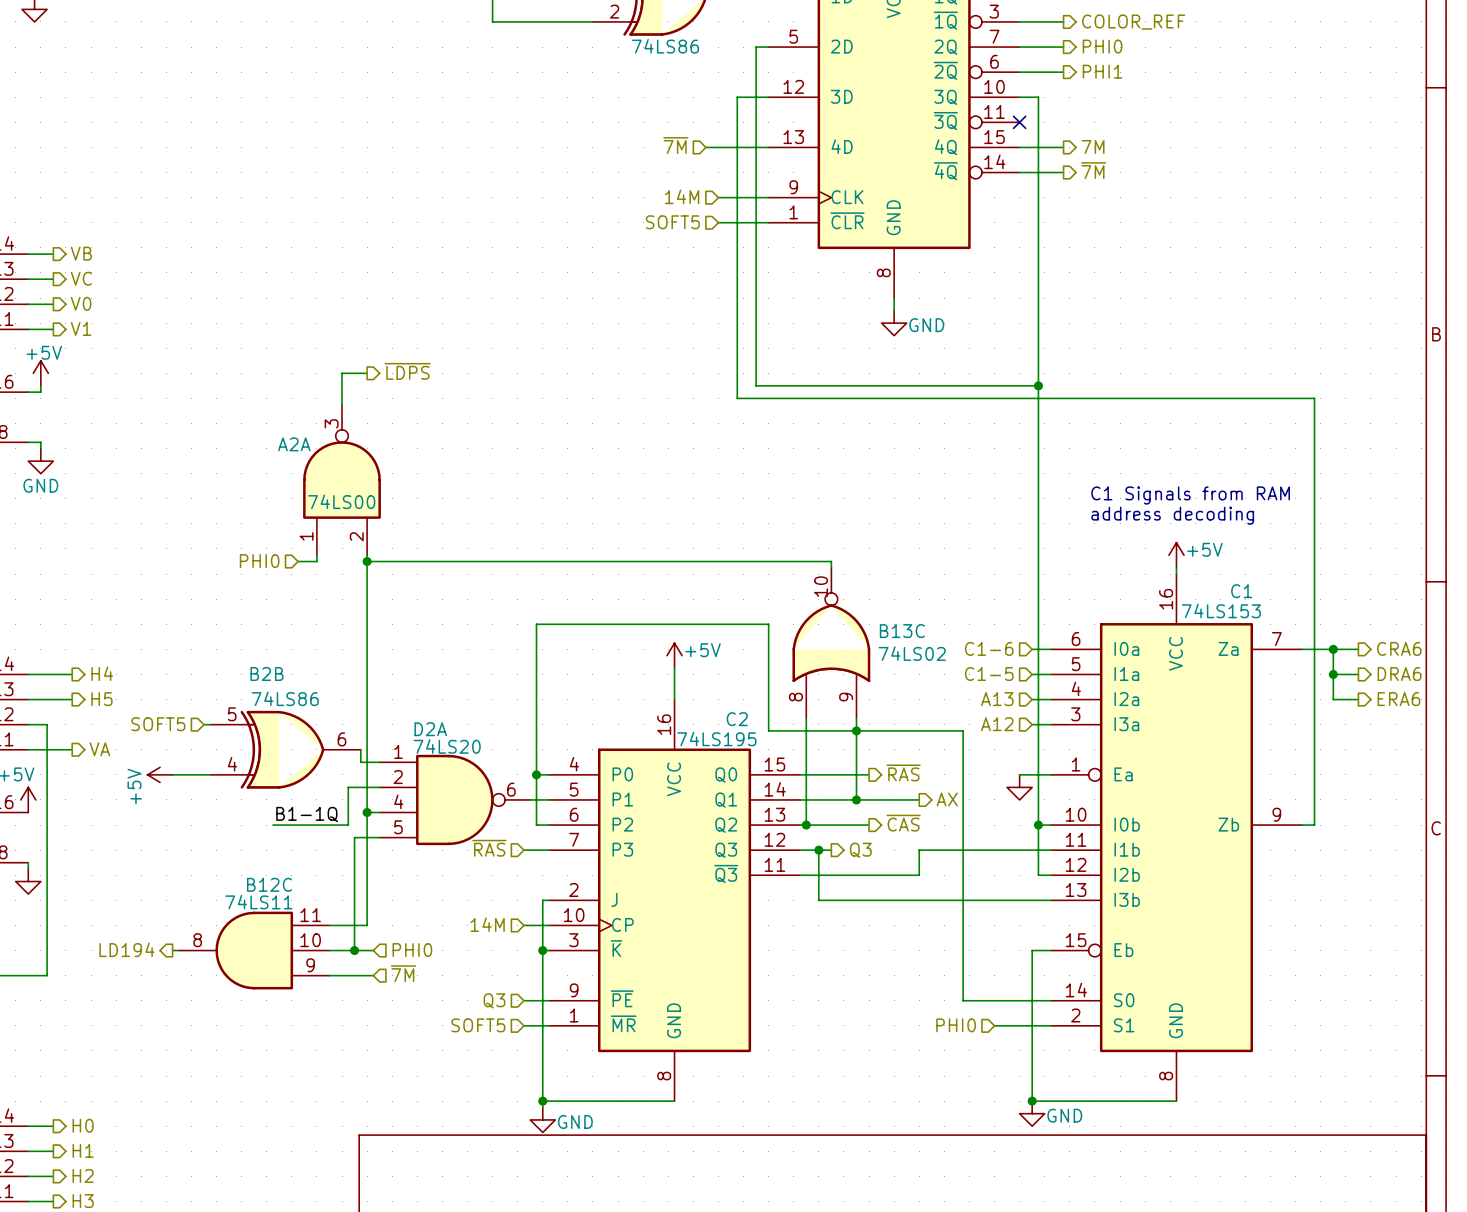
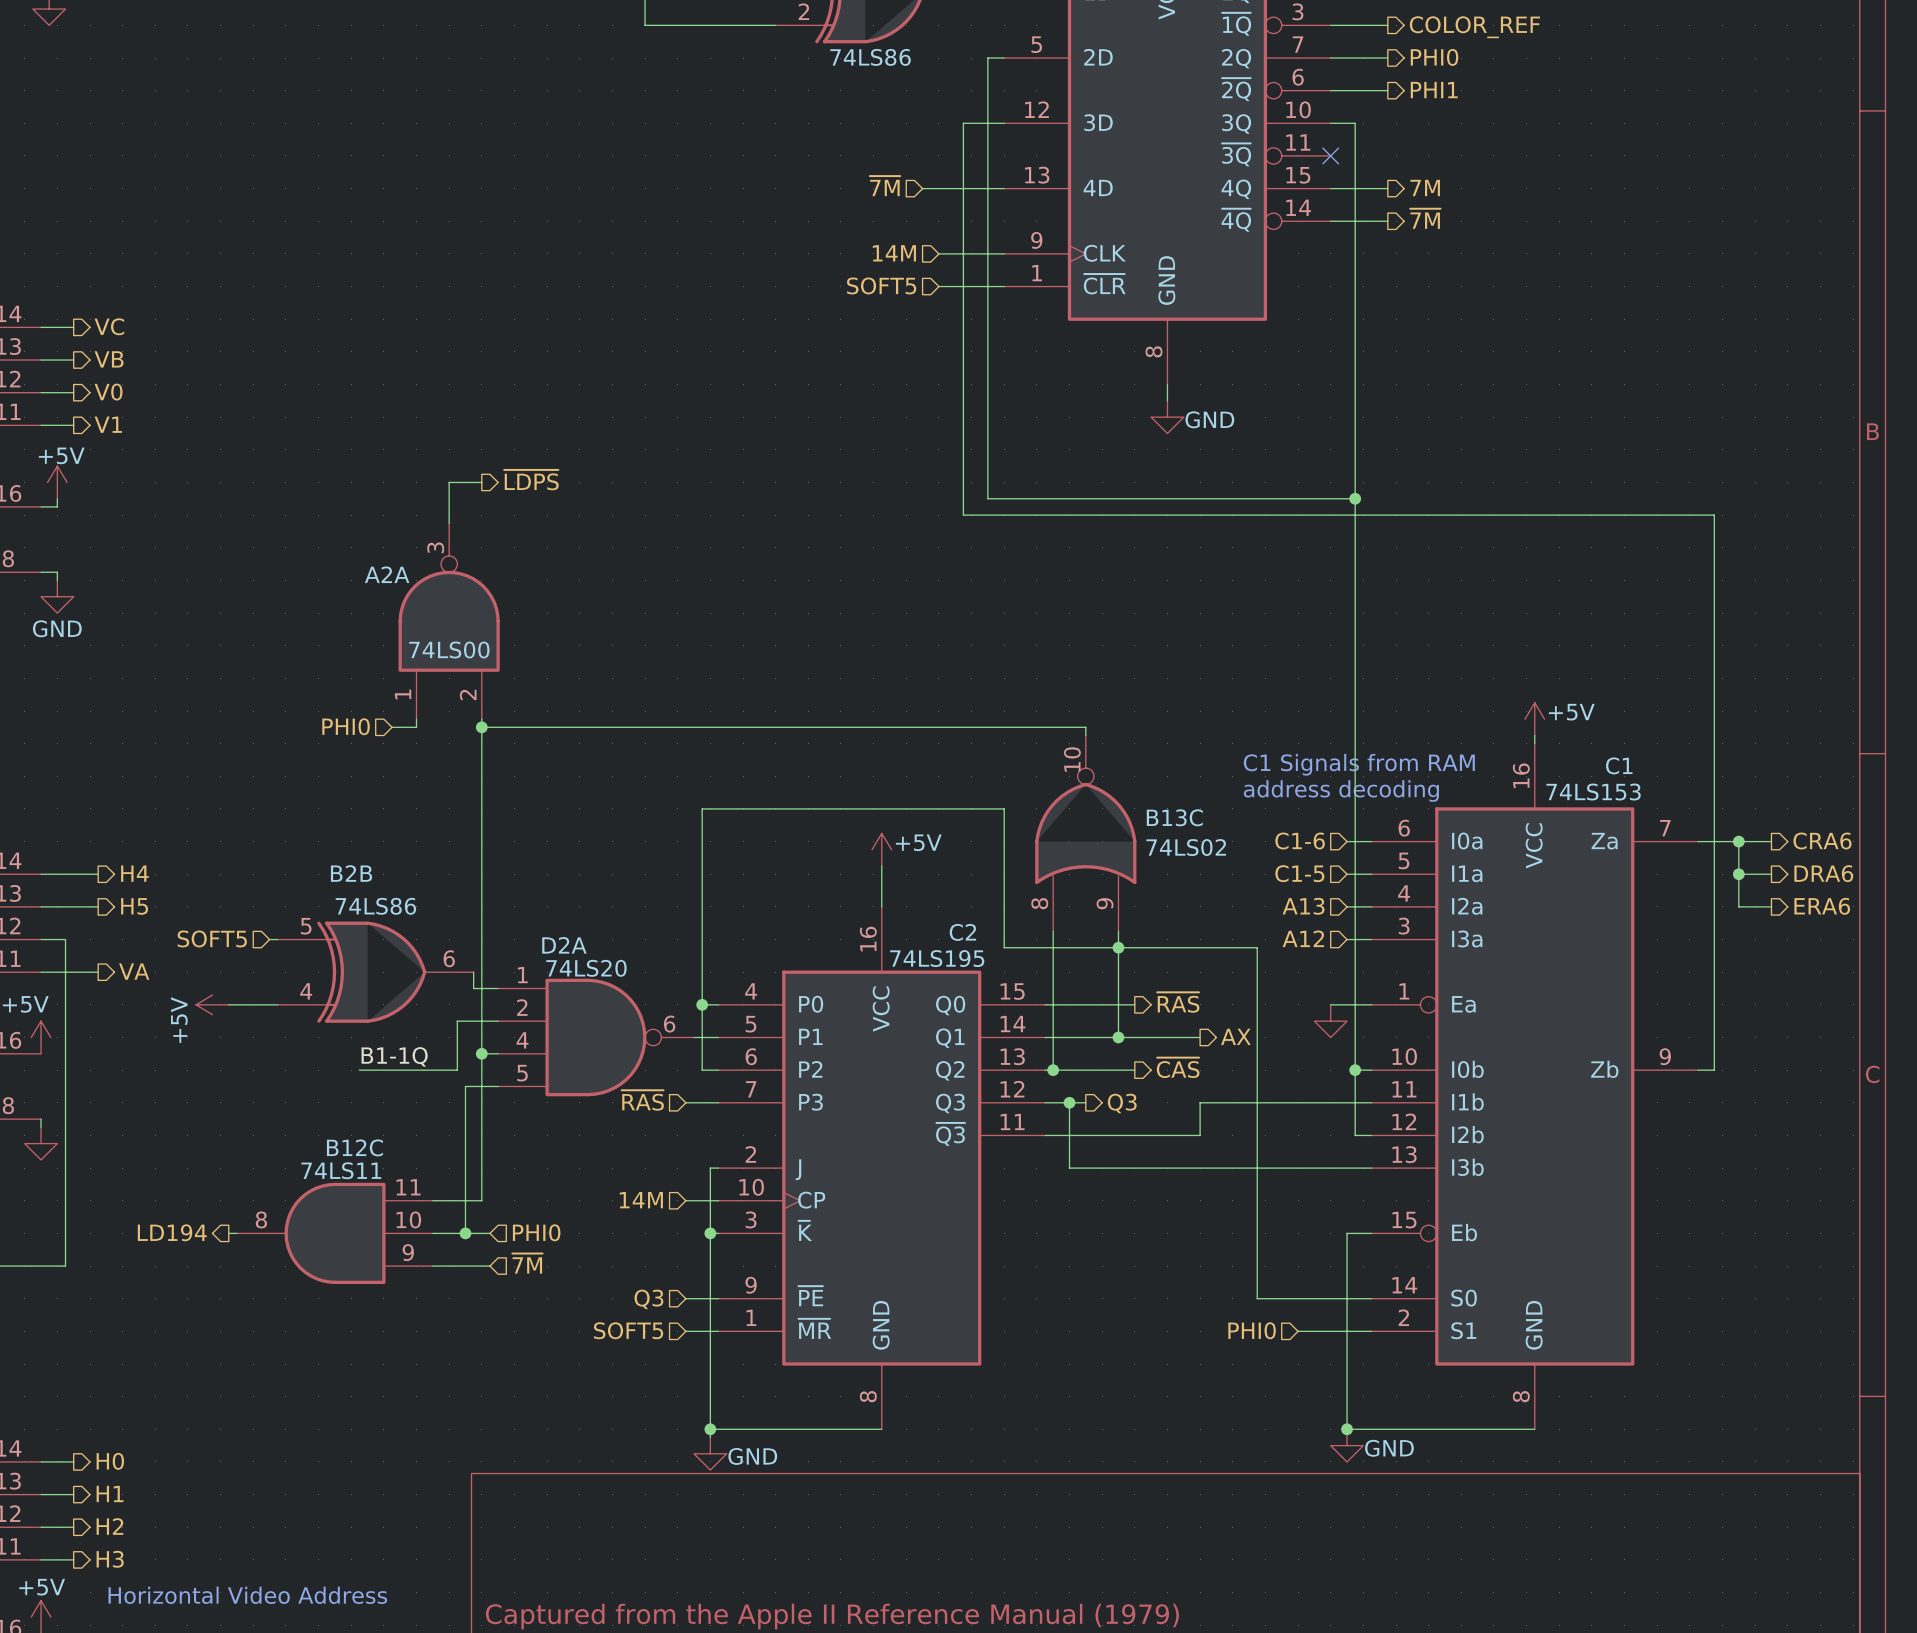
hierarchical label: VB (81, 253) -> VC (109, 326)
hierarchical label: VC (81, 278) -> VB (109, 359)
text position: C1 Signals from RAM (1190, 495) -> C1 Signals from RAM (1359, 764)
text position: address decoding (1172, 515) -> address decoding (1341, 791)

